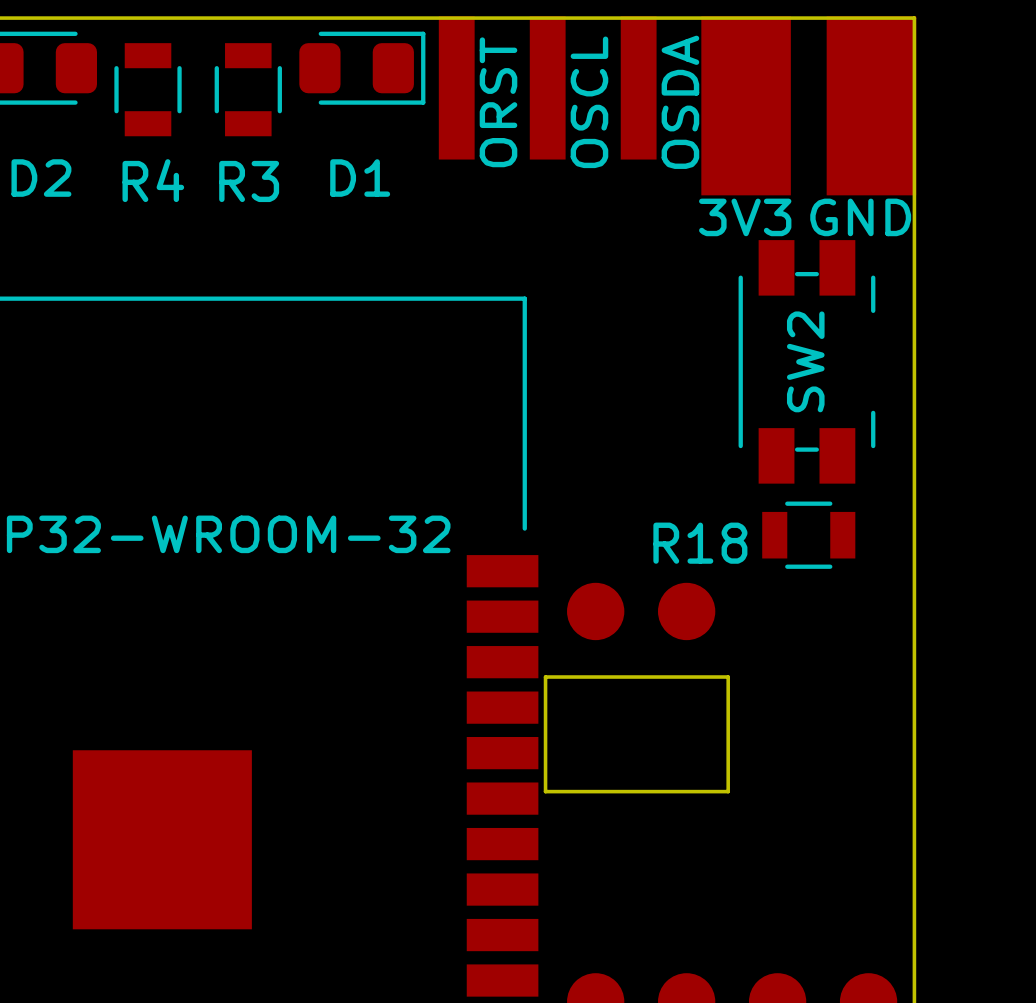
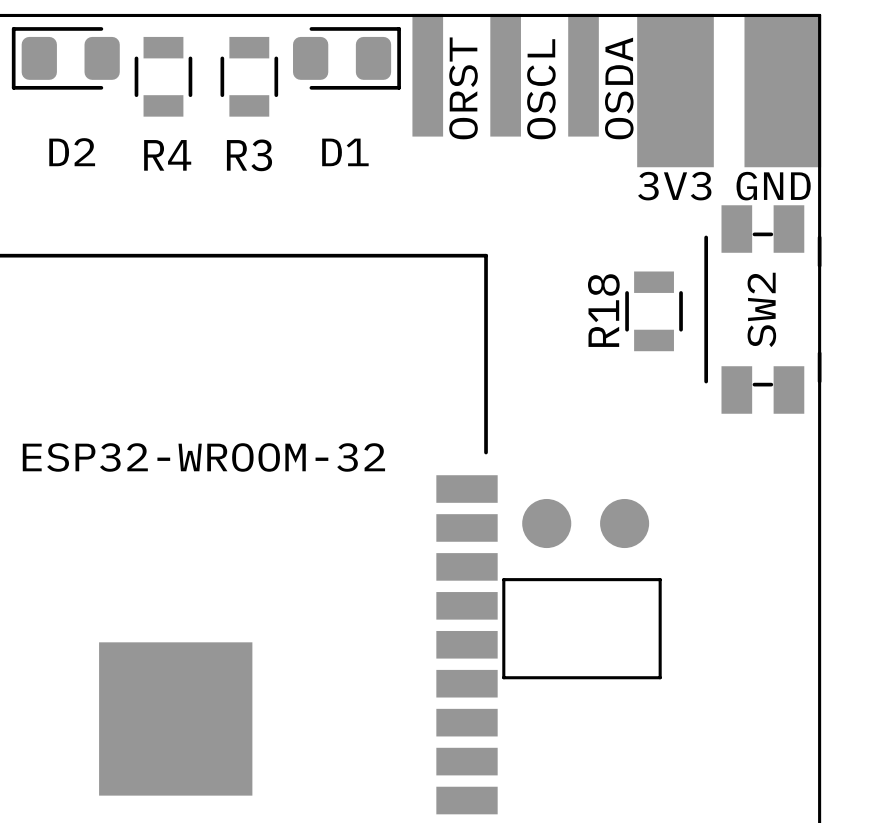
SW2 position: (806, 361) -> (762, 309)
R18 rotation: 0° (808, 535) -> 90° clockwise (654, 311)
R18 position: (808, 535) -> (654, 311)

